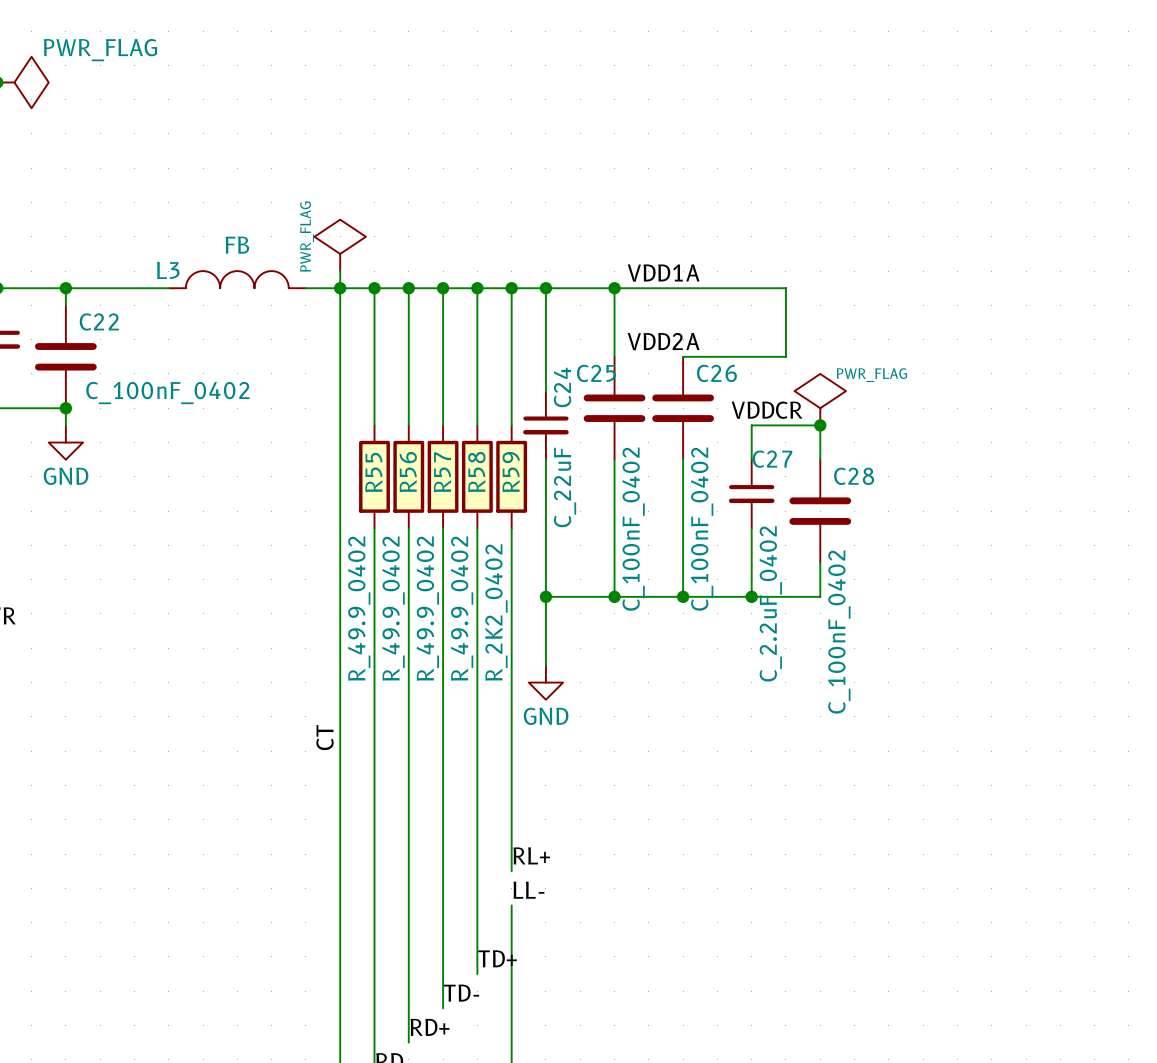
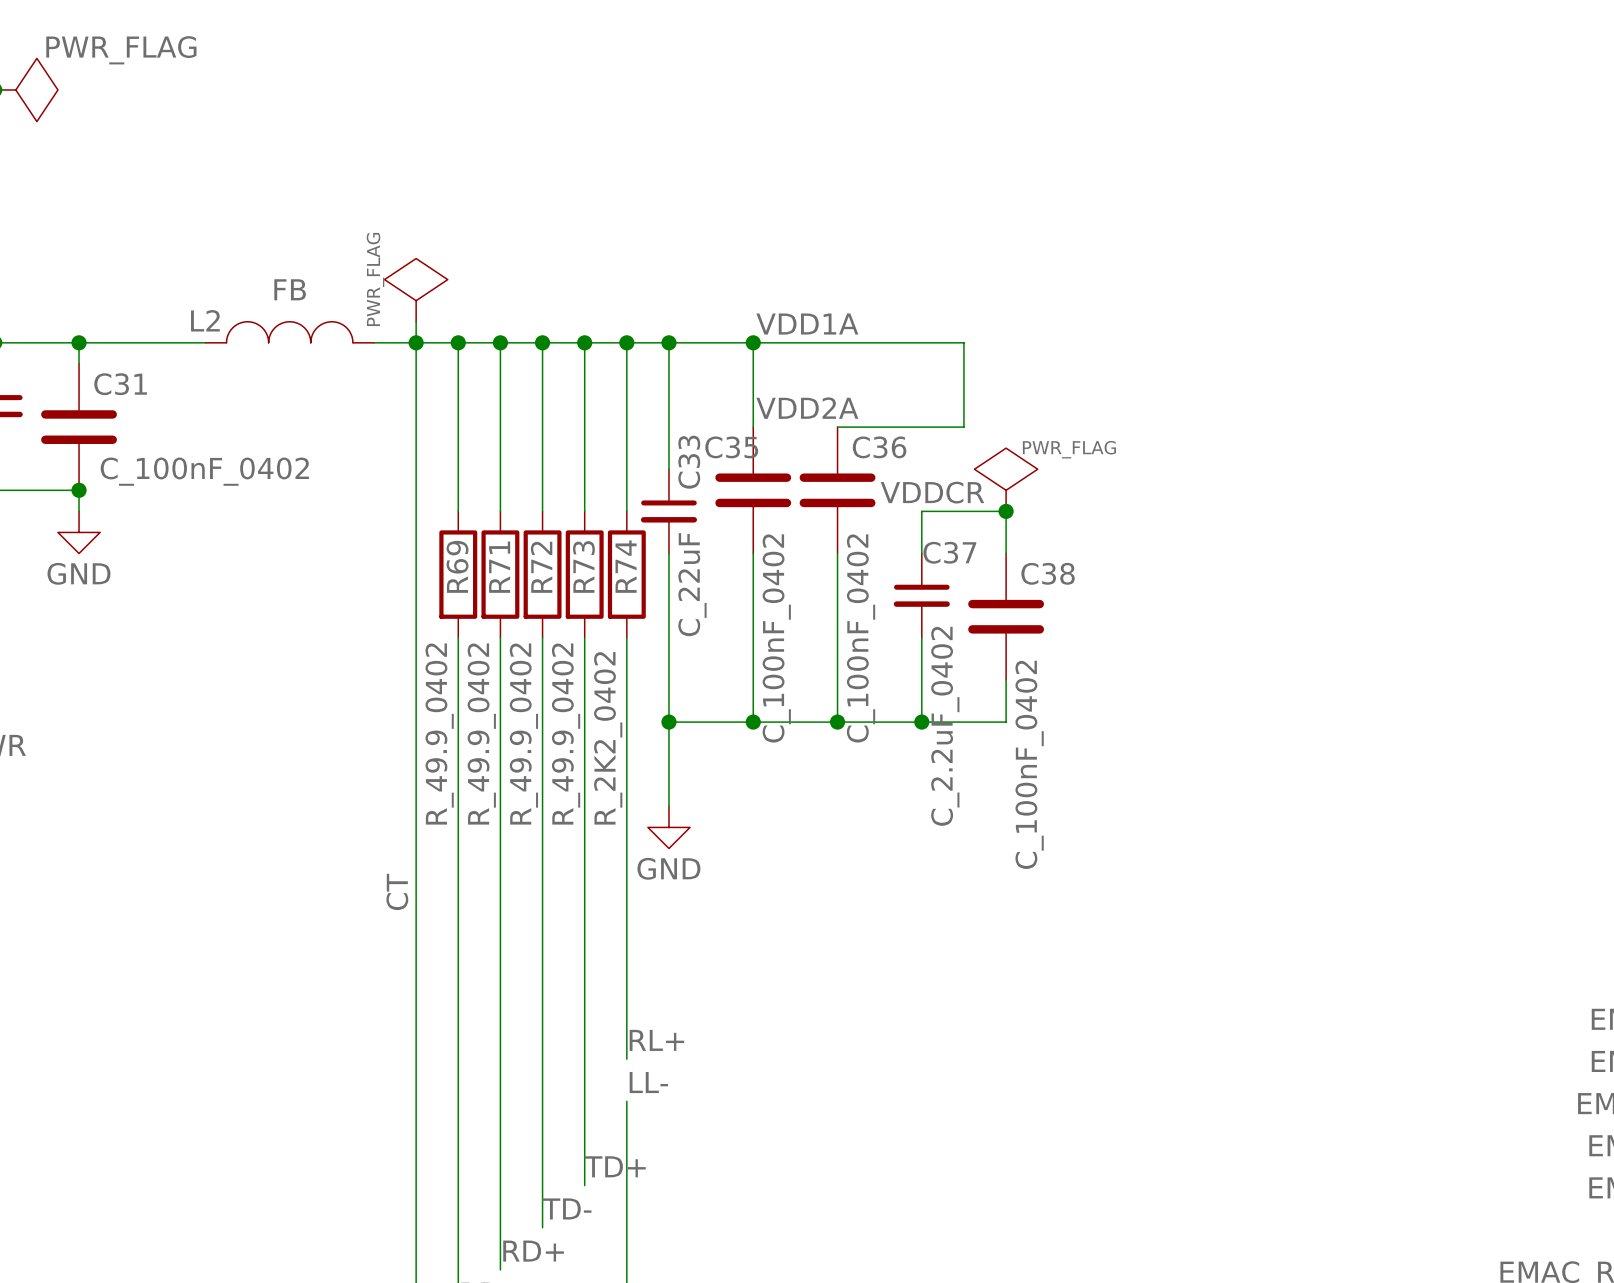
L3 name: L3 (168, 270) -> L2 (205, 320)
C22 name: C22 (99, 321) -> C31 (120, 384)
C25 name: C25 (596, 373) -> C35 (731, 447)
C26 name: C26 (716, 373) -> C36 (879, 447)
C24 name: C24 (562, 387) -> C33 (689, 462)
C27 name: C27 (772, 459) -> C37 (949, 552)
R55 name: R55 (373, 472) -> R69 (457, 566)
R56 name: R56 (408, 472) -> R71 (499, 567)
R57 name: R57 (442, 472) -> R72 (541, 567)
R58 name: R58 (476, 472) -> R73 (583, 566)
R59 name: R59 (511, 472) -> R74 (626, 566)
C28 name: C28 (854, 476) -> C38 (1048, 573)

